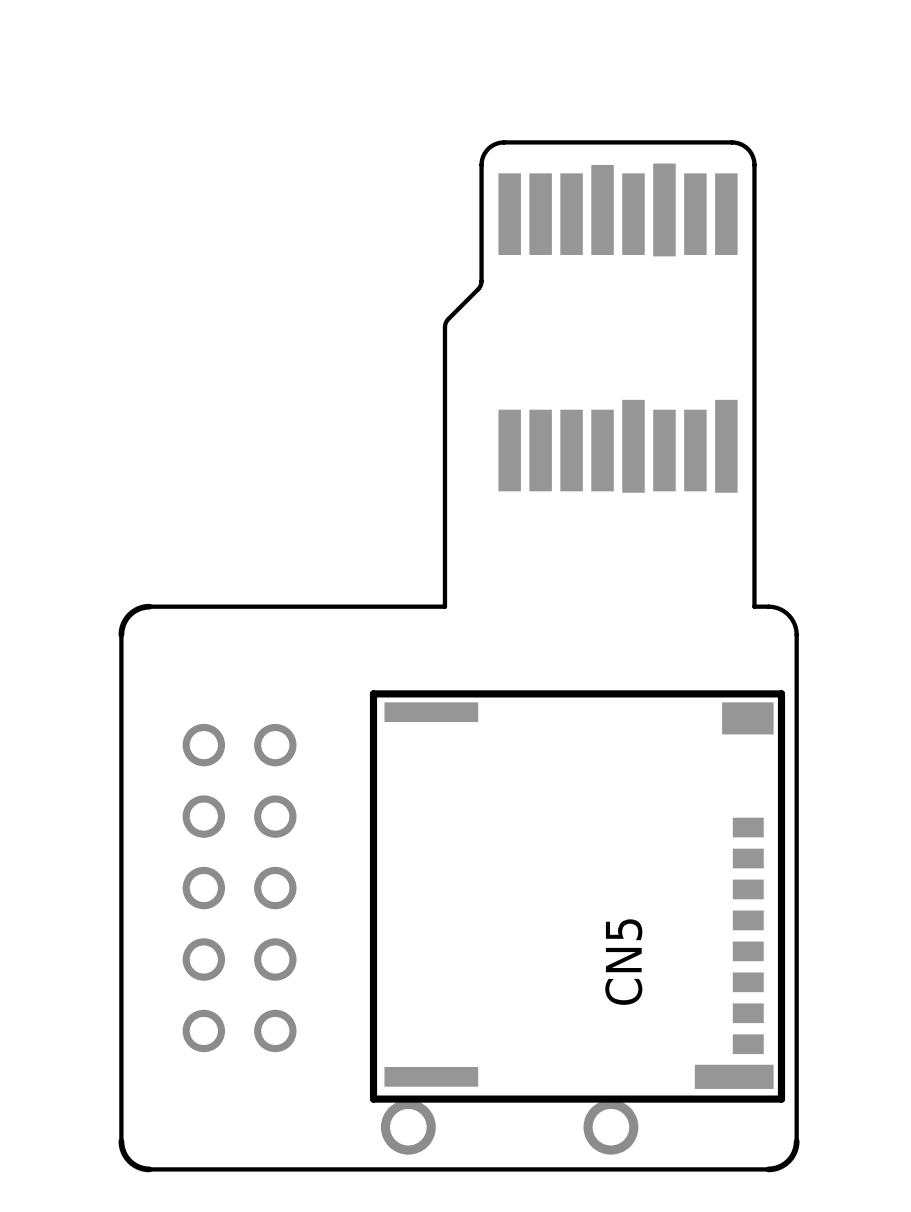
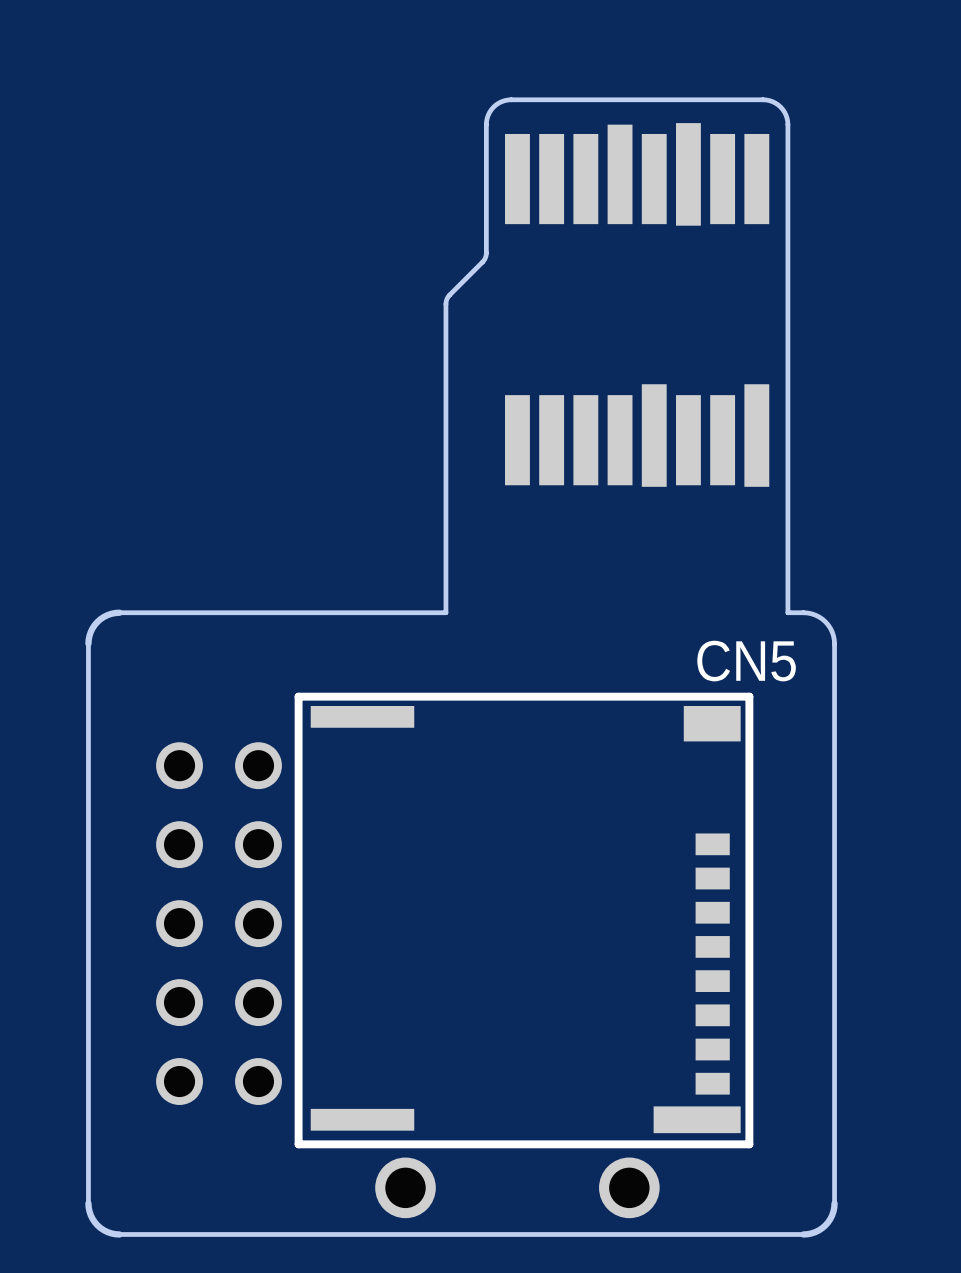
CN5 position: (577, 896) -> (523, 920)
CN5 name rotation: 0° (623, 962) -> 90° clockwise (746, 661)
CN5 name position: CN5 (623, 962) -> CN5 (746, 661)

